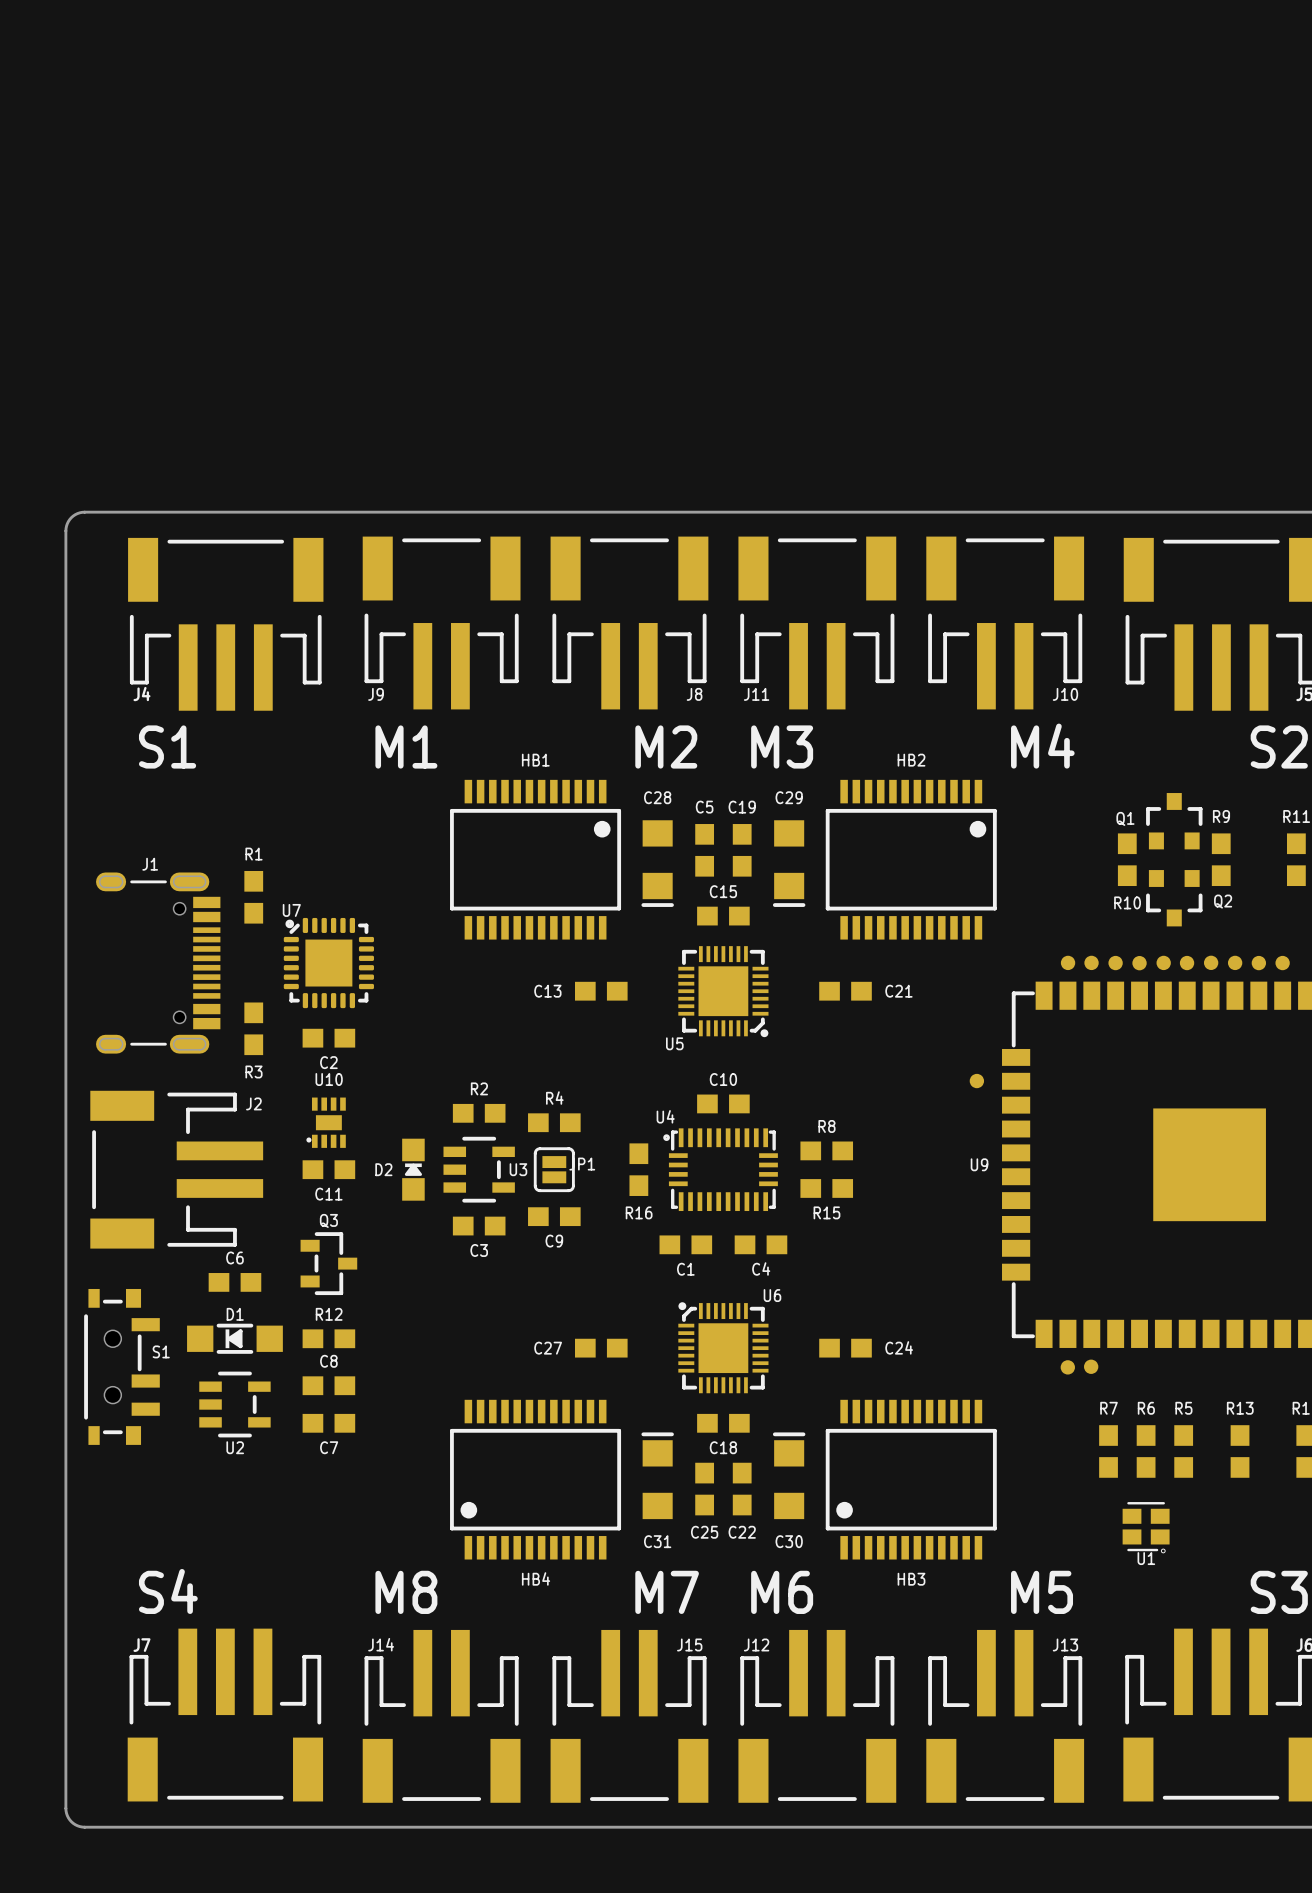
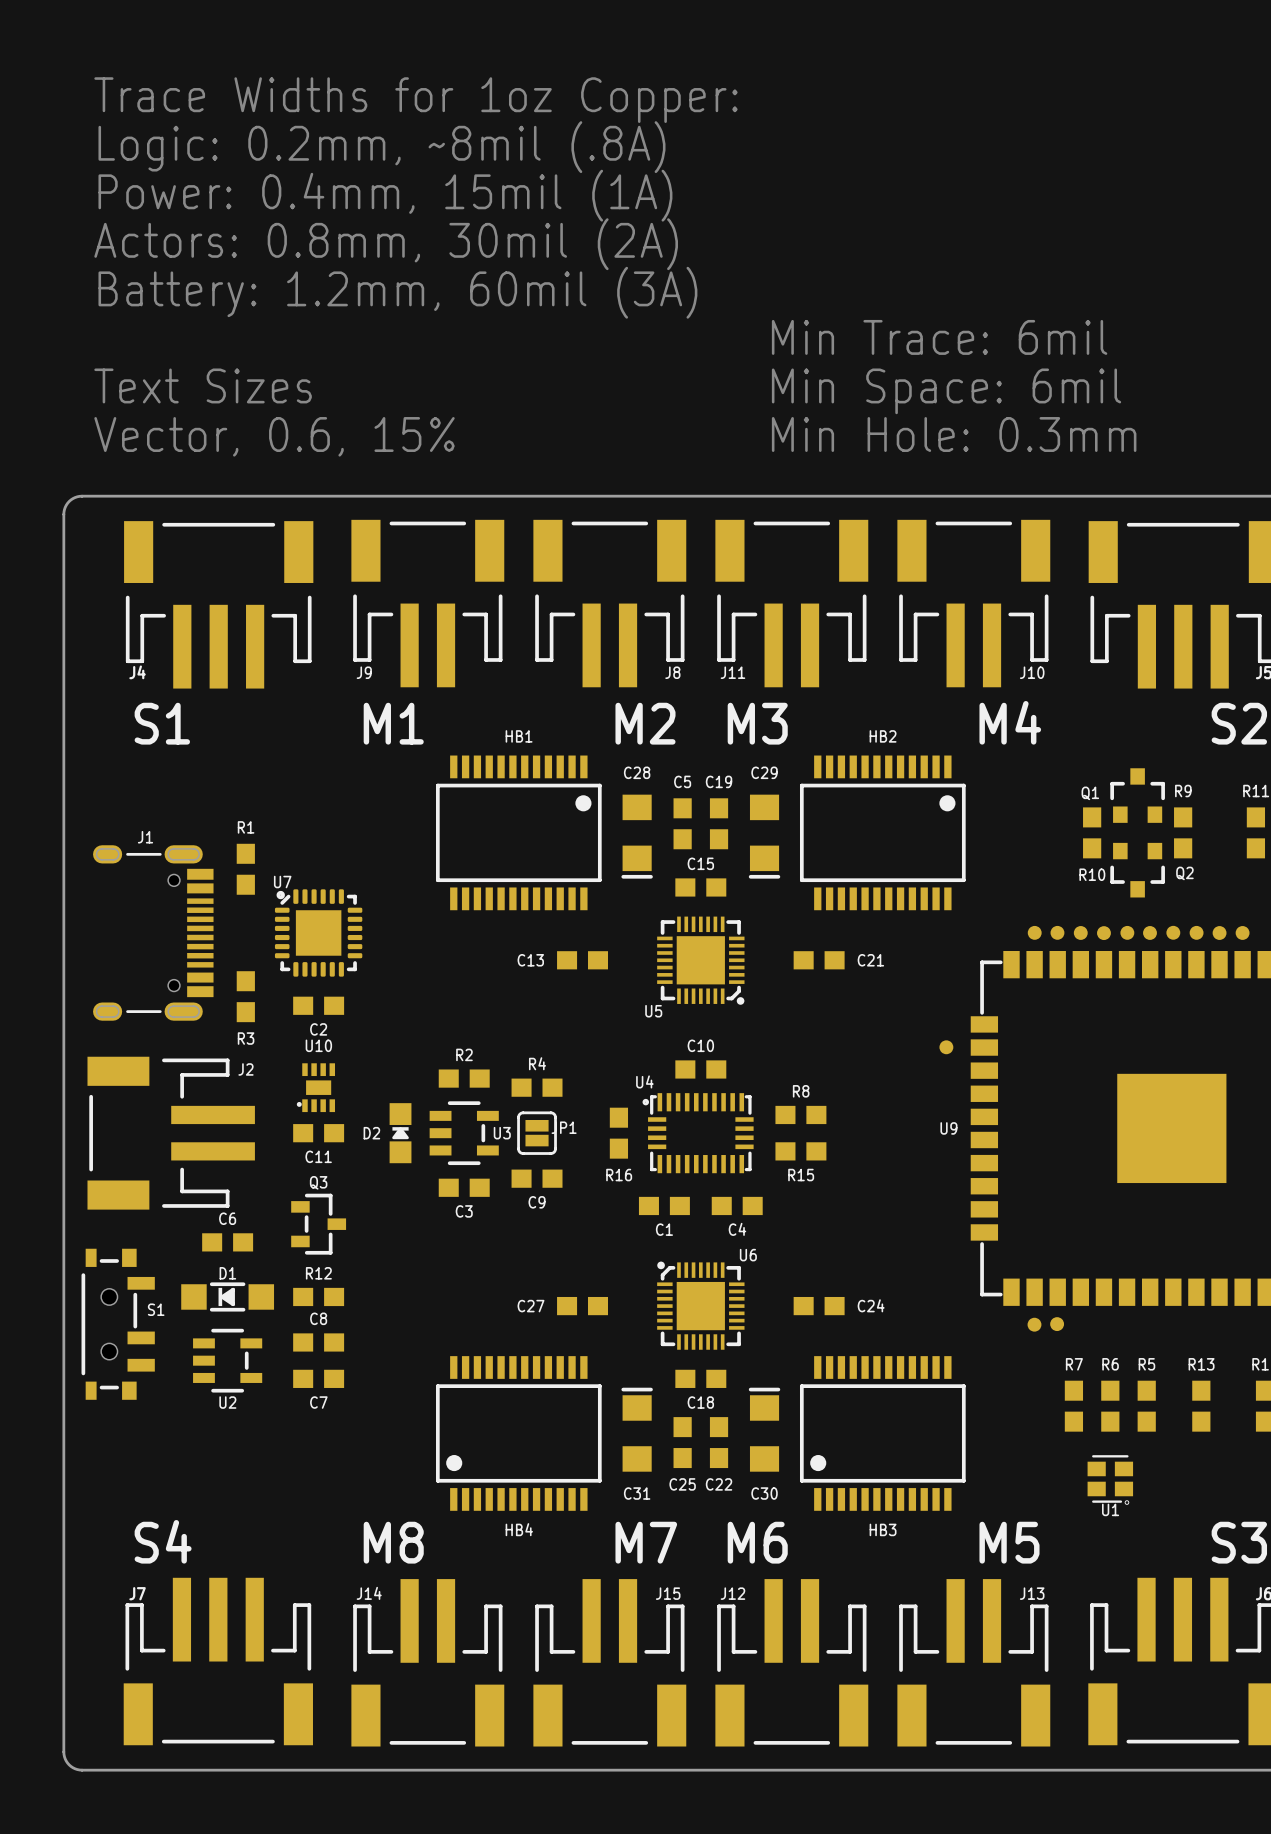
text: none -> Trace Widths for 1oz Copper: (415, 100)
text: none -> Logic: 0.2mm, ~8mil (.8A) (381, 147)
text: none -> Power: 0.4mm, 15mil (1A) (385, 195)
text: none -> Actors: 0.8mm, 30mil (2A) (386, 244)
text: none -> Battery: 1.2mm, 60mil (3A) (397, 292)
text: none -> Min Trace: 6mil (939, 337)
text: none -> Text Sizes (203, 385)
text: none -> Min Space: 6mil (946, 391)
text: none -> Min Hole: 0.3mm (954, 434)
text: none -> Vector, 0.6, 15% (274, 436)

